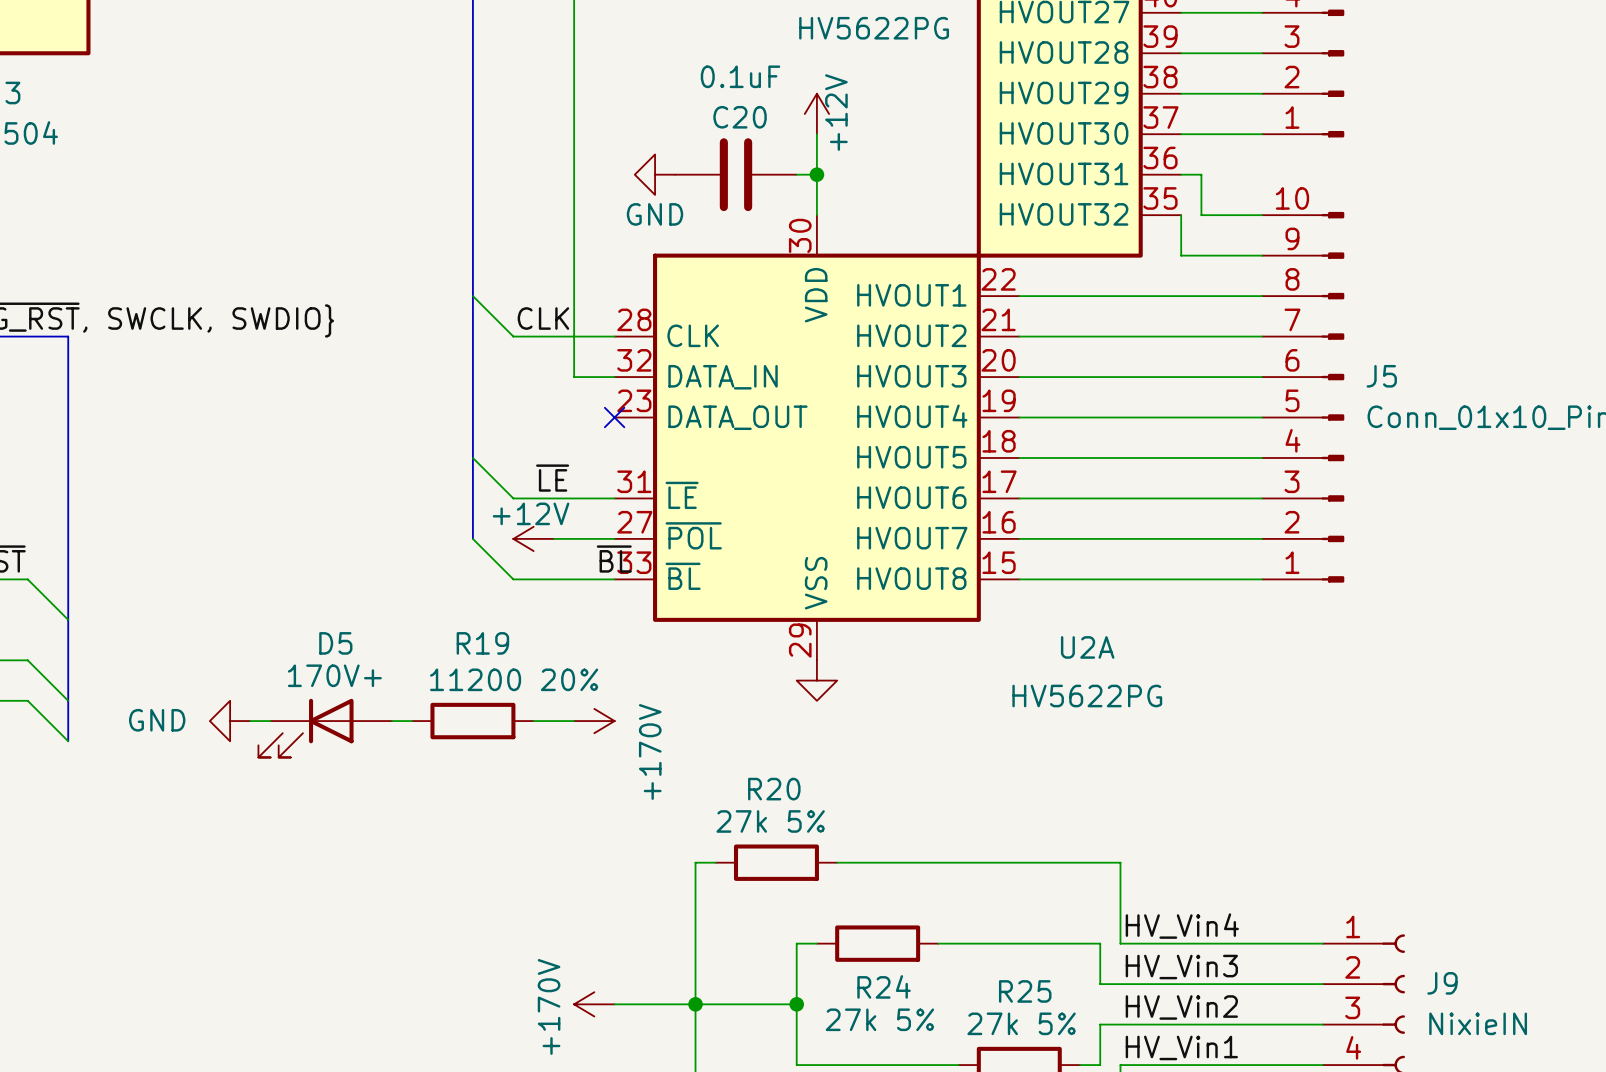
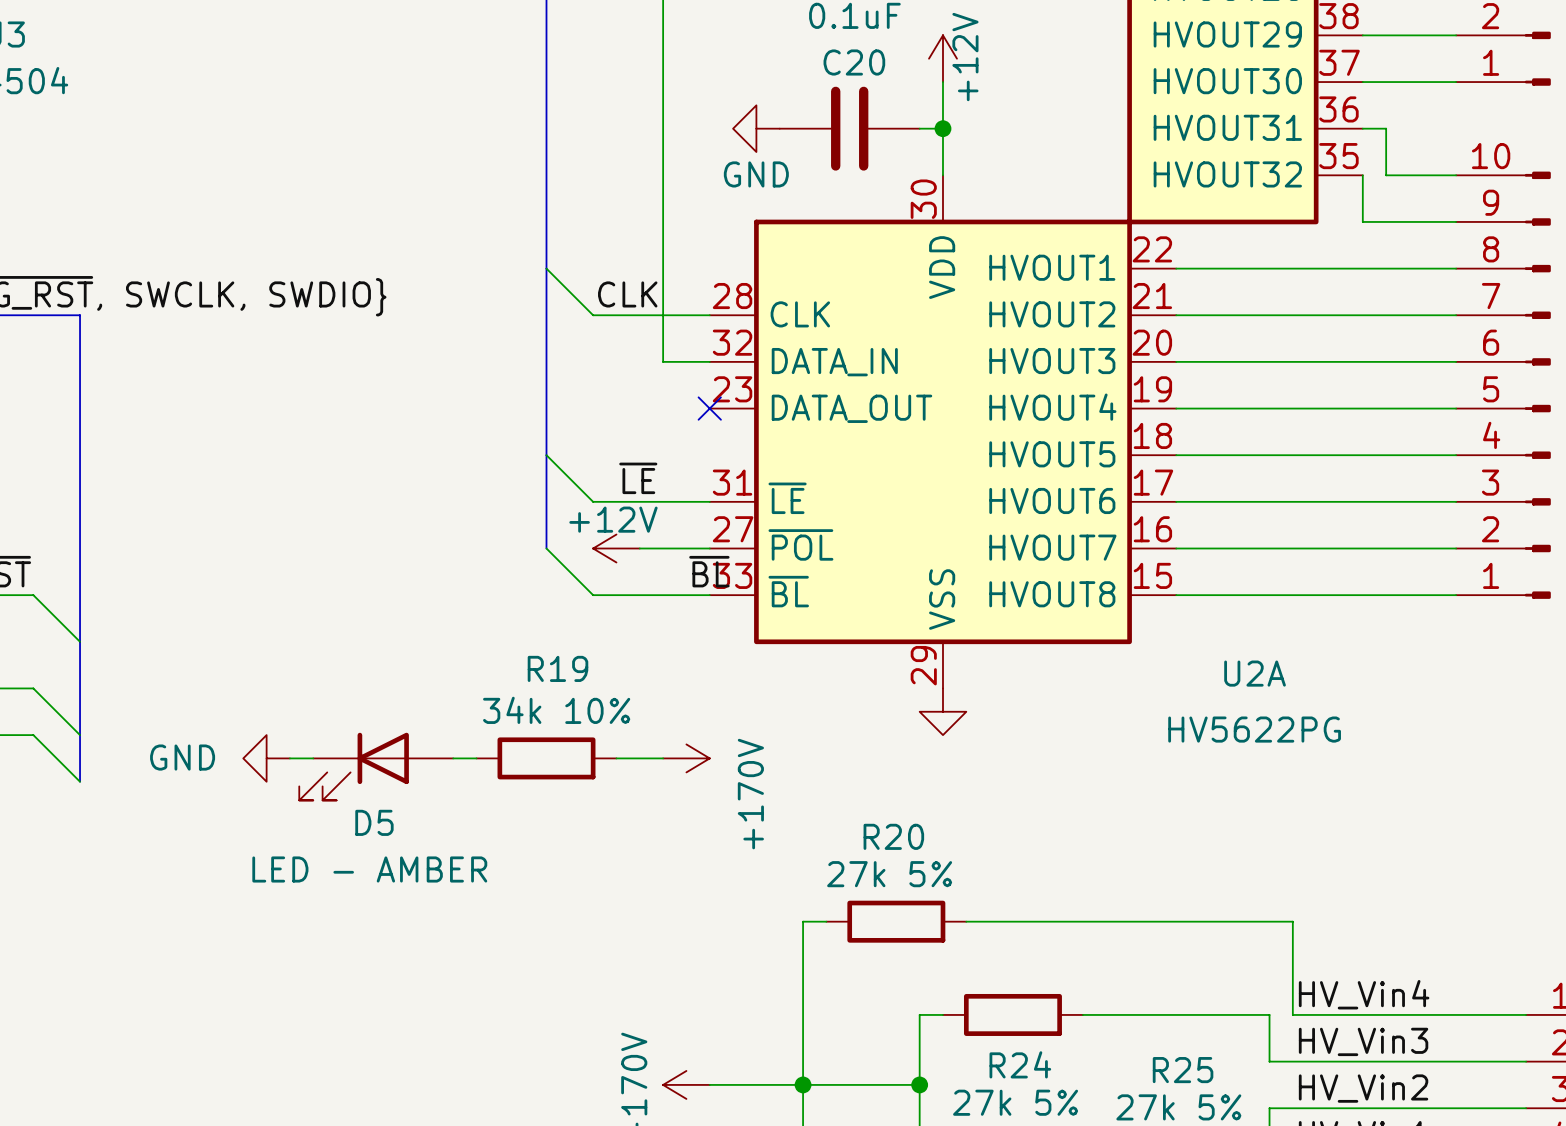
D5 name position: D5 (335, 643) -> D5 (374, 822)
D5 value: 170V+ (334, 675) -> none
R19 value: 11200 20% (514, 679) -> 34k 10% (556, 710)
D5 text: none -> LED - AMBER (369, 869)

